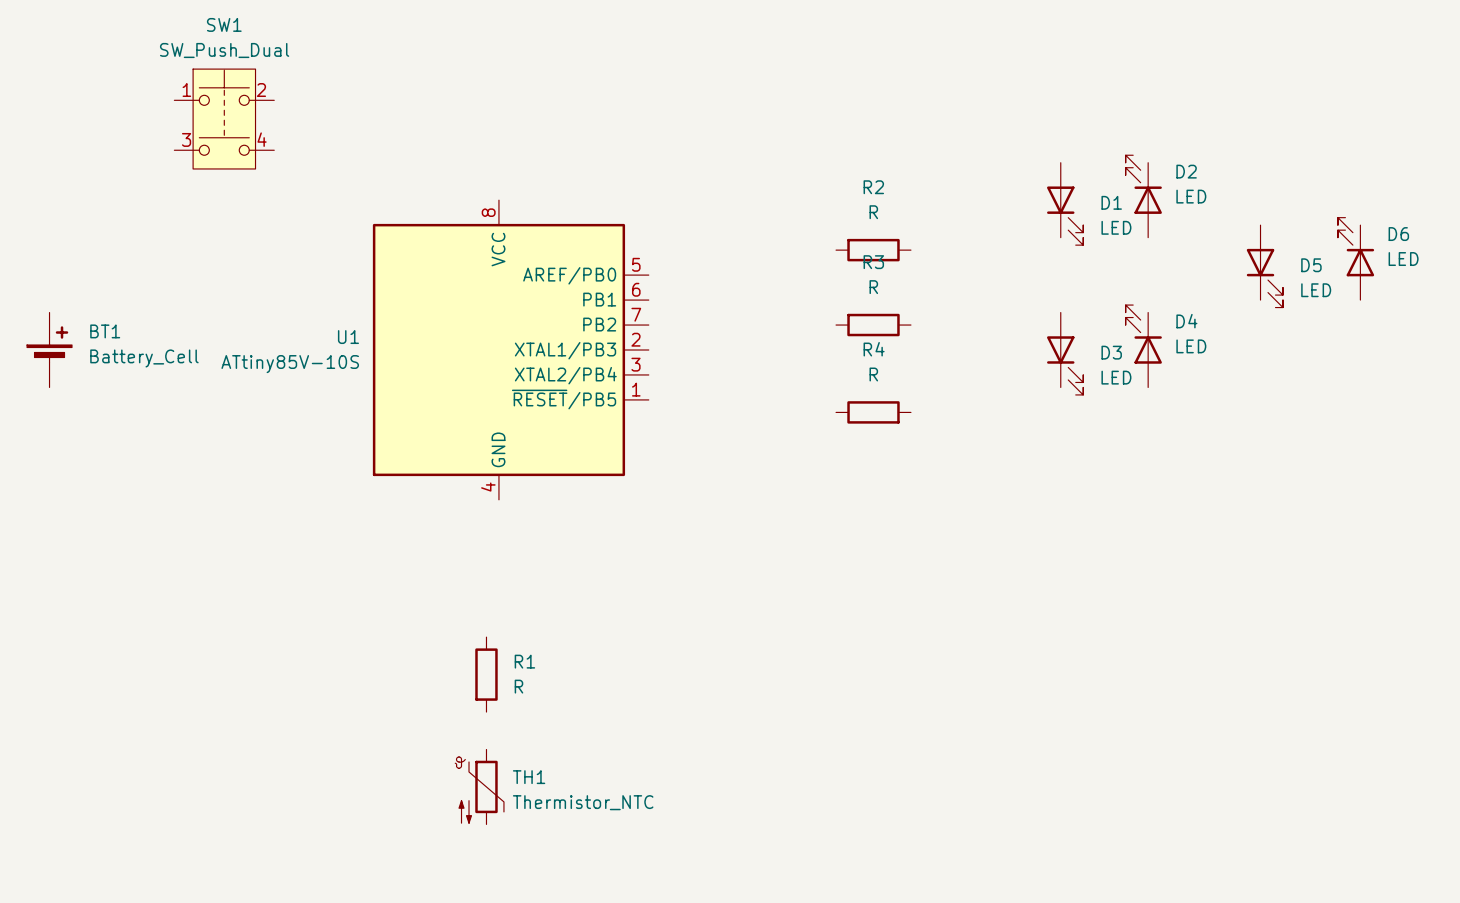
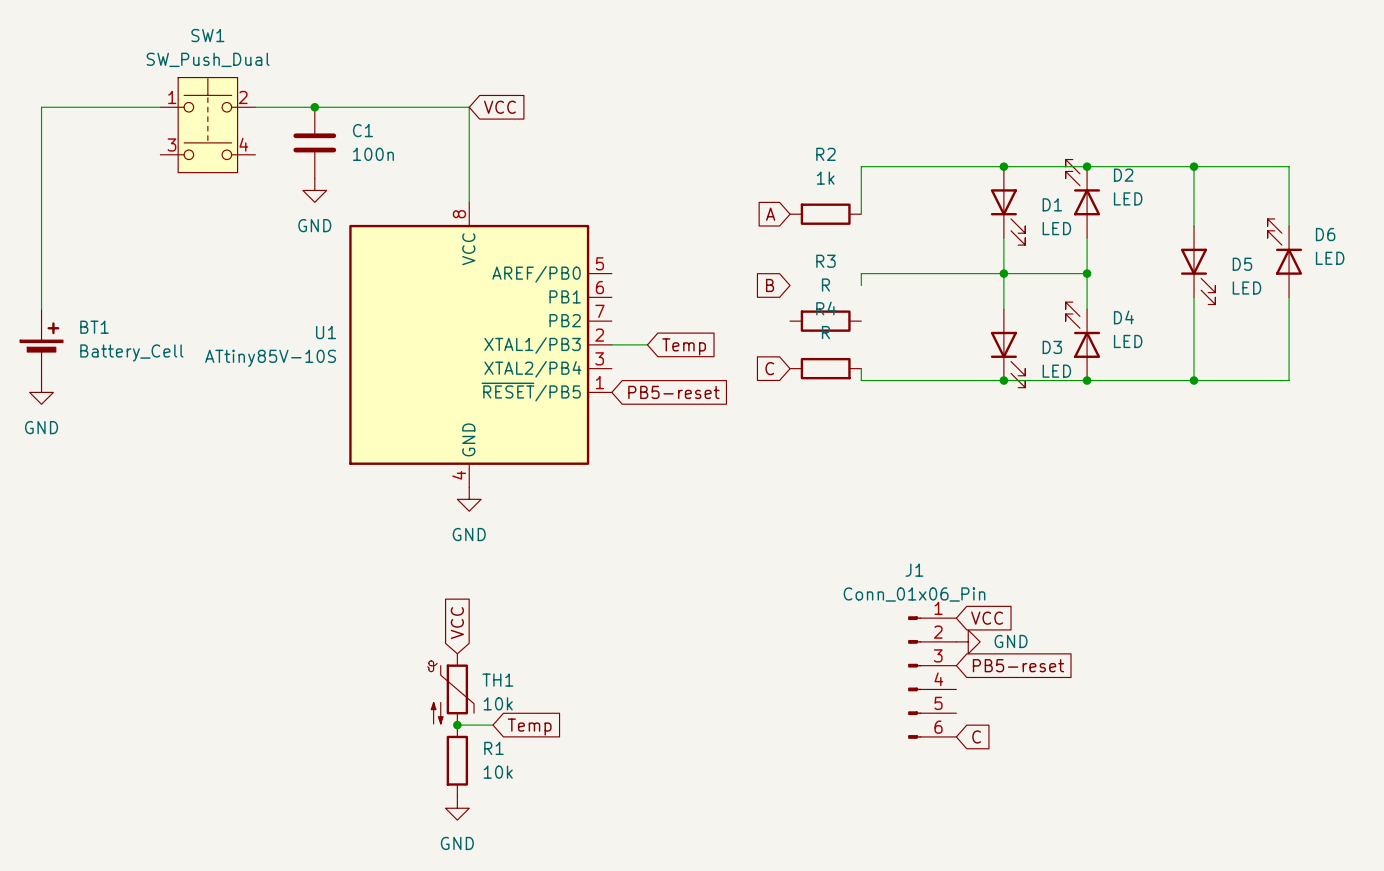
wire: none -> (160, 107) (41, 107) (41, 309)
wire: none -> (255, 107) (469, 107) (469, 202)
junction: none -> (314, 107)
global label: none -> VCC (499, 107)
C1: none -> 100n (314, 142)
junction: none -> (1003, 166)
junction: none -> (1087, 166)
wire: none -> (1193, 166) (1193, 226)
junction: none -> (1193, 166)
power symbol: none -> GND (314, 190)
global label: none -> A (770, 214)
R2 value: R (873, 212) -> 1k (825, 178)
wire: none -> (861, 214) (861, 166) (1289, 166) (1289, 226)
wire: none -> (1003, 237) (1003, 309)
wire: none -> (1087, 237) (1087, 309)
R2 position: (873, 250) -> (825, 214)
junction: none -> (1003, 273)
wire: none -> (1087, 273) (861, 273) (861, 285)
junction: none -> (1087, 273)
global label: none -> B (770, 285)
wire: none -> (1193, 297) (1193, 380)
wire: none -> (1289, 297) (1289, 380) (861, 380) (861, 368)
wire: none -> (611, 344) (647, 344)
global label: none -> Temp (684, 346)
global label: none -> C (769, 368)
junction: none -> (1003, 380)
junction: none -> (1087, 380)
junction: none -> (1193, 380)
power symbol: none -> GND (41, 392)
global label: none -> PB5-reset (673, 392)
R4 position: (873, 412) -> (825, 368)
power symbol: none -> GND (469, 499)
global label: none -> VCC (987, 618)
global label: none -> VCC (457, 623)
power symbol: none -> GND (968, 641)
R1 position: (486, 674) -> (457, 760)
R1 value: R (518, 686) -> 10k (498, 772)
global label: none -> PB5-reset (1018, 665)
J1: none -> Conn_01x06_Pin (932, 677)
wire: none -> (457, 725) (493, 725)
junction: none -> (457, 725)
global label: none -> Temp (529, 727)
global label: none -> C (976, 736)
TH1 position: (479, 786) -> (450, 689)
TH1 value: Thermistor_NTC (583, 802) -> 10k (498, 703)
power symbol: none -> GND (457, 808)

